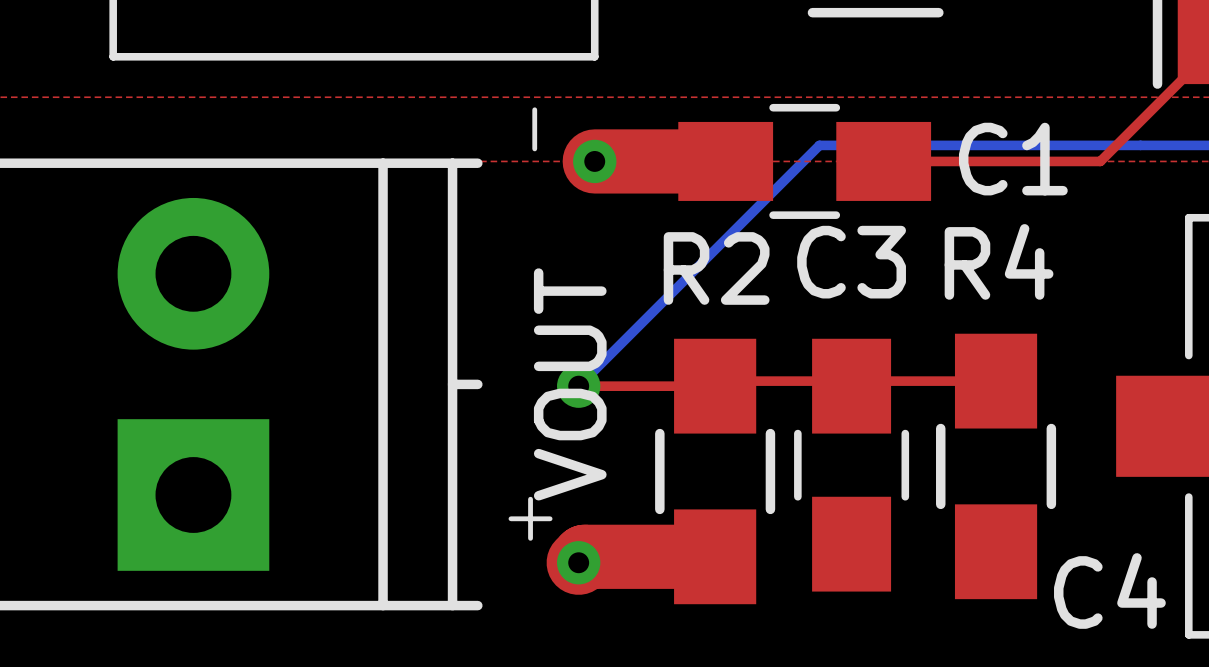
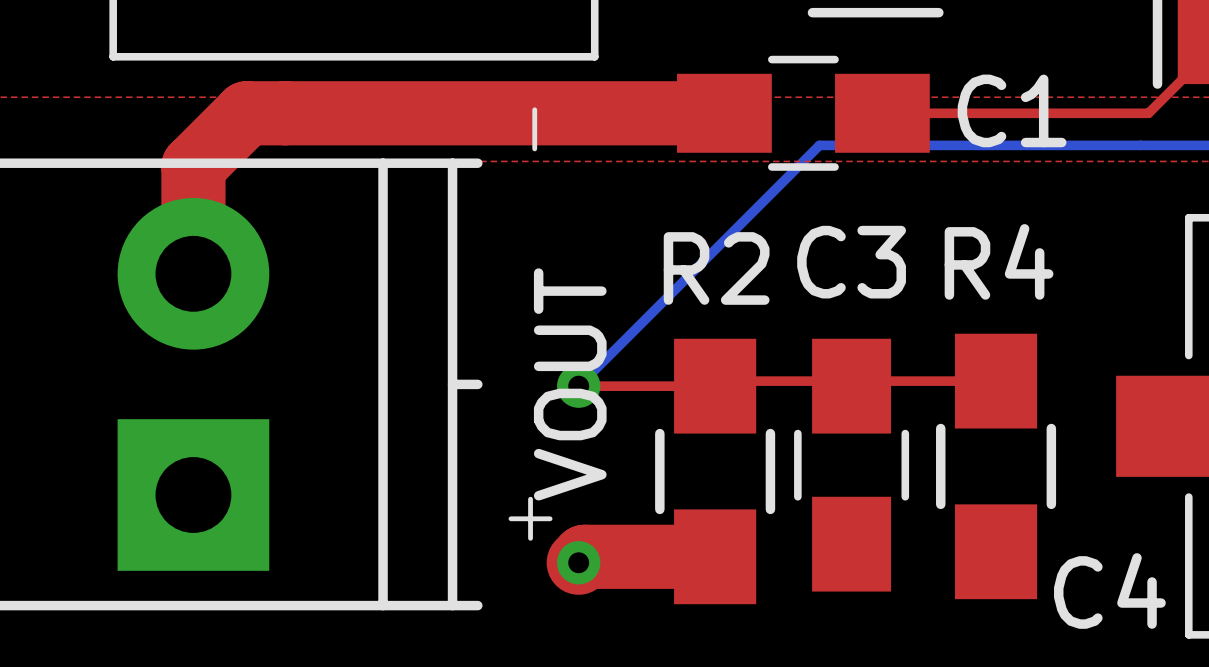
top track: none -> (724, 113) (246, 113) (193, 166) (193, 273)
top track: (1148, 113) (1100, 161) (883, 161) -> (1148, 113) (882, 113)
top track: (594, 161) (725, 161) -> none
via: (594, 161) -> none
C1 position: (804, 161) -> (803, 113)

